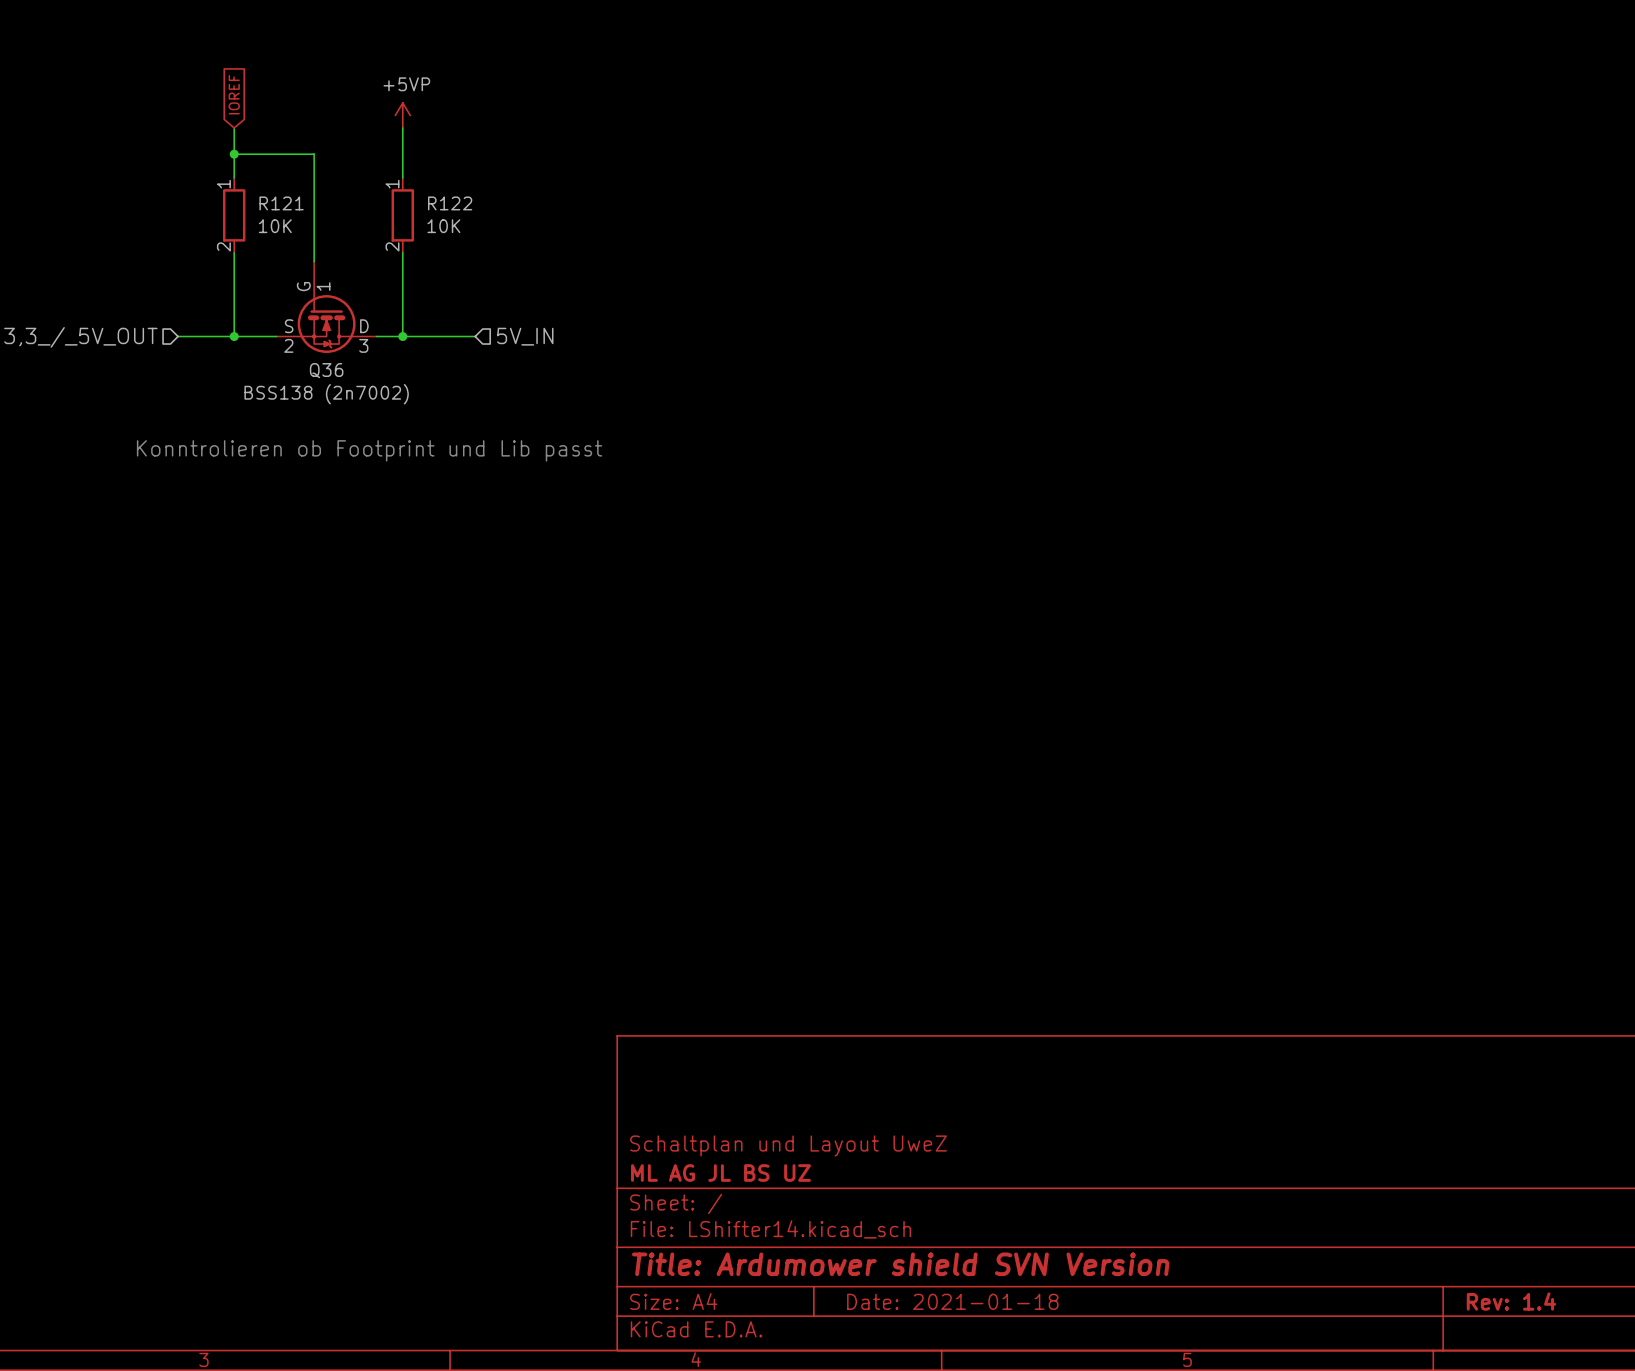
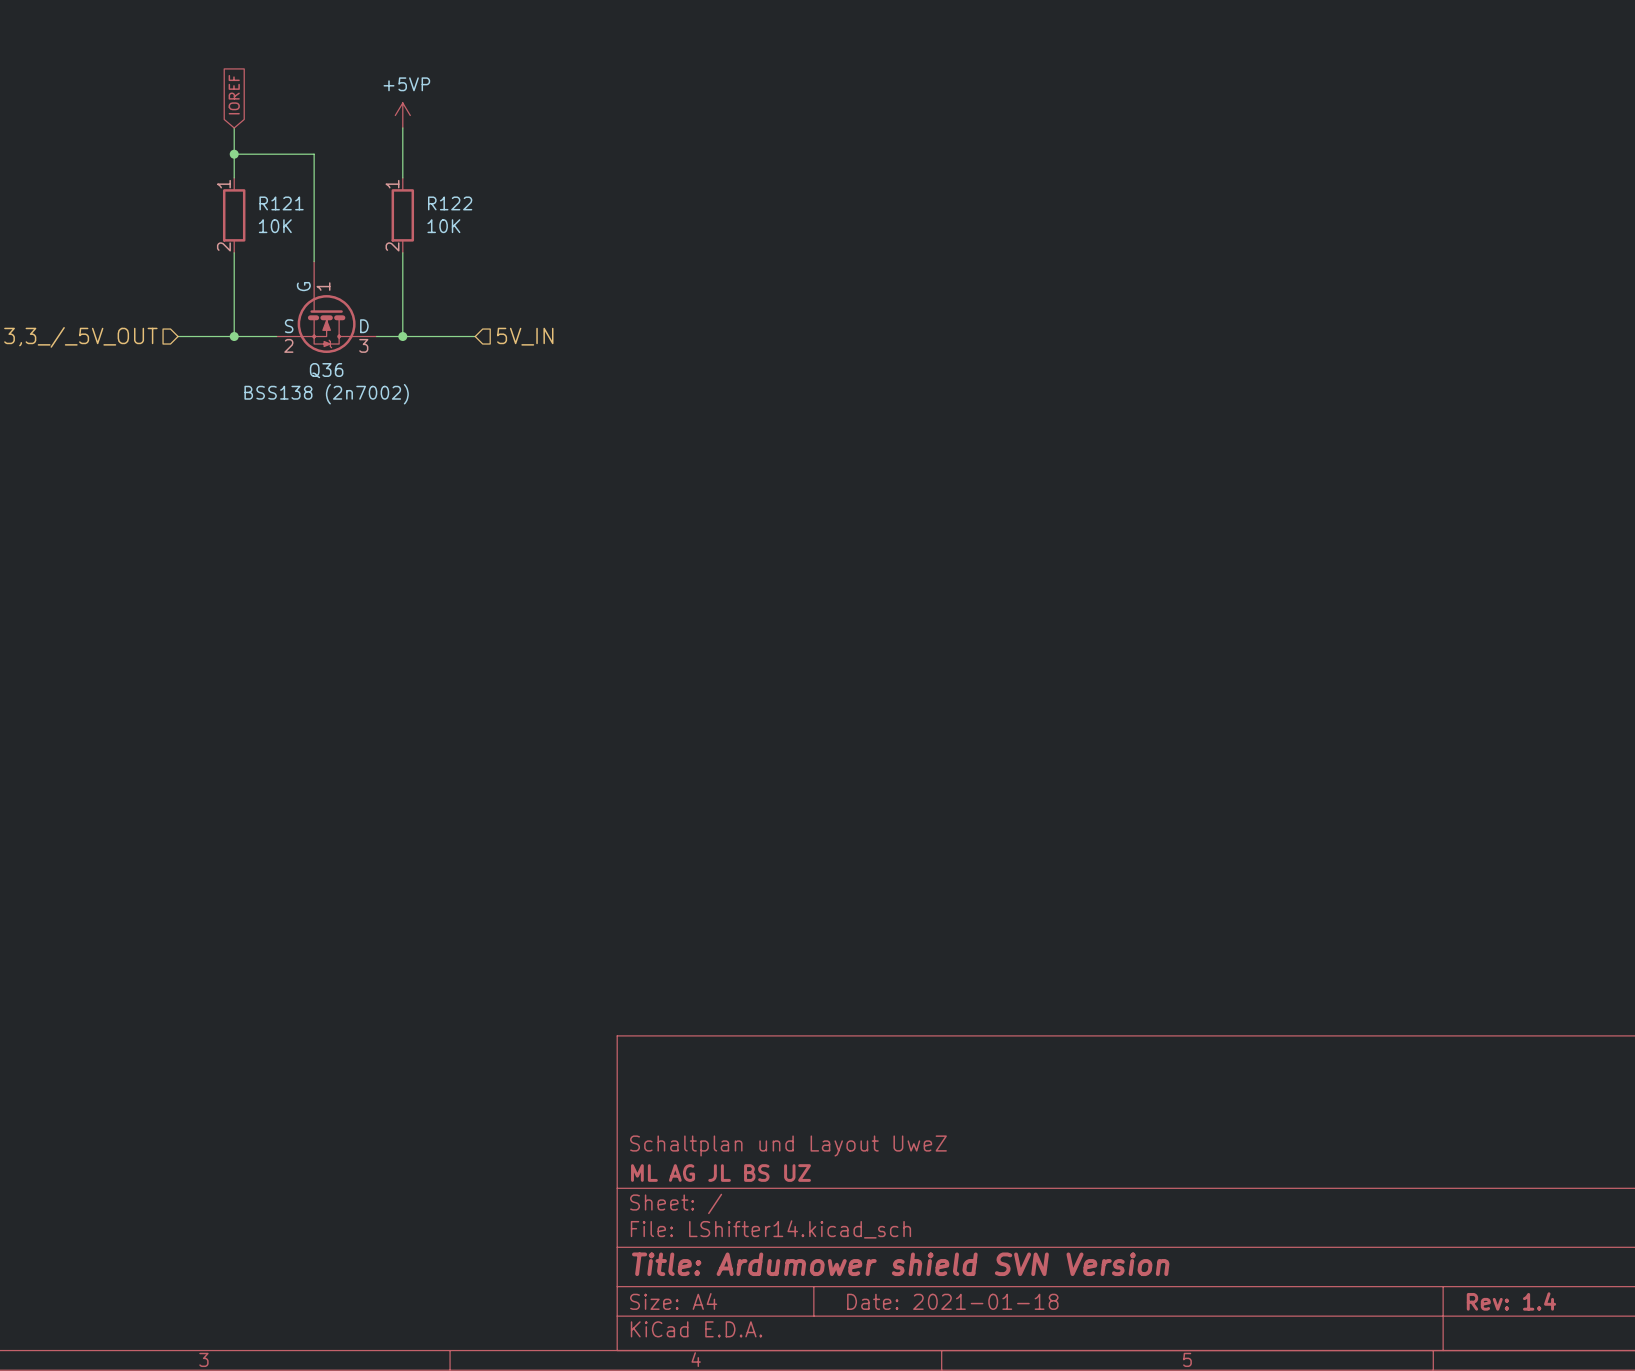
text: Konntrolieren ob Footprint und Lib passt (369, 450) -> none

